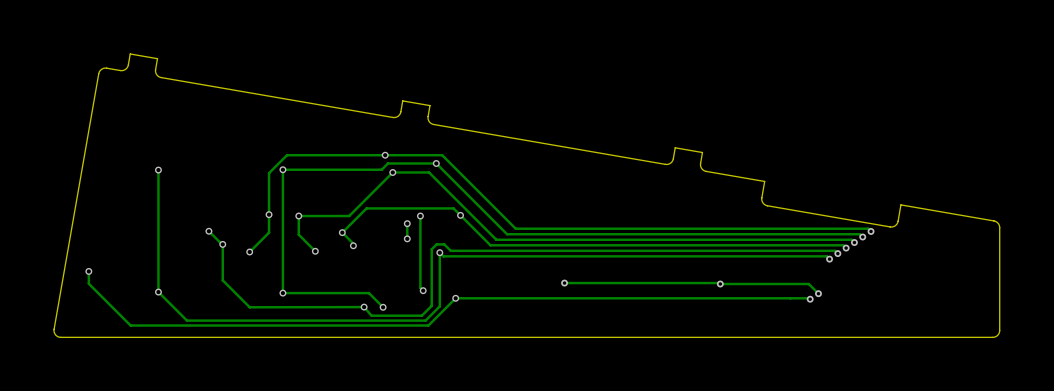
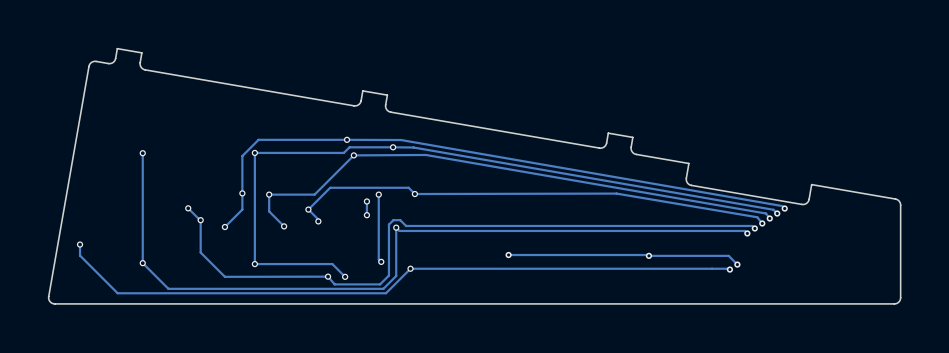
track: (385, 155) (442, 155) (515, 228) (868, 228) -> (347, 139) (401, 140) (782, 206)
track: (436, 163) (507, 234) (859, 234) -> (393, 147) (413, 147) (774, 211)
track: (392, 172) (429, 172) (496, 239) (851, 239) (854, 242) -> (353, 155) (426, 154) (766, 213) (769, 218)
track: (460, 215) (490, 245) (843, 245) (846, 248) -> (414, 194) (616, 193) (757, 217) (762, 223)

